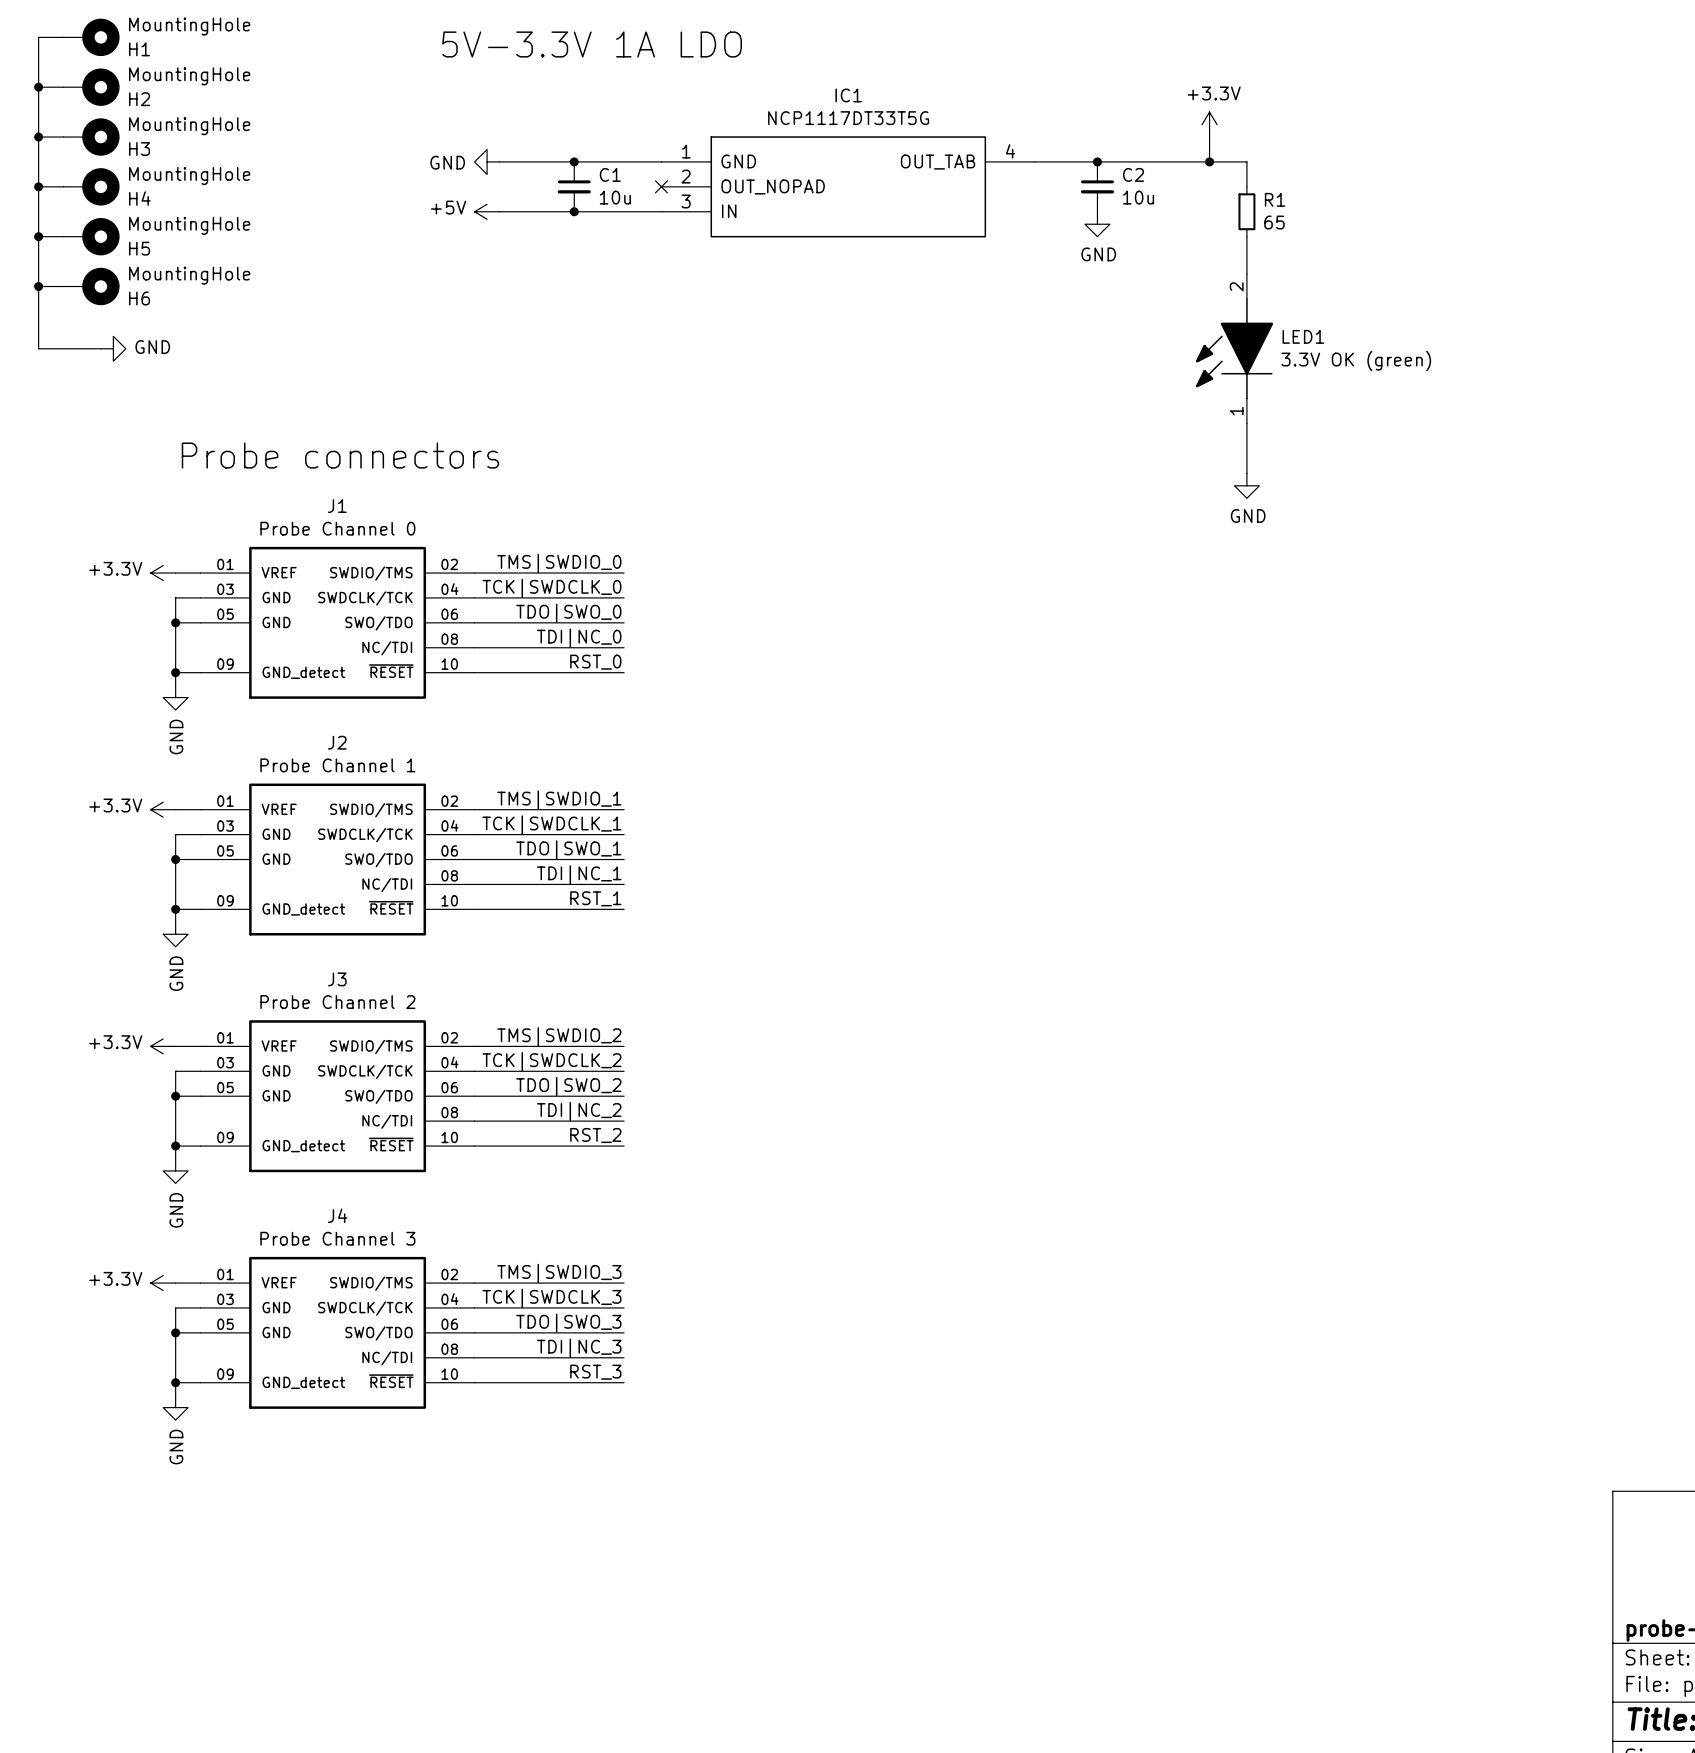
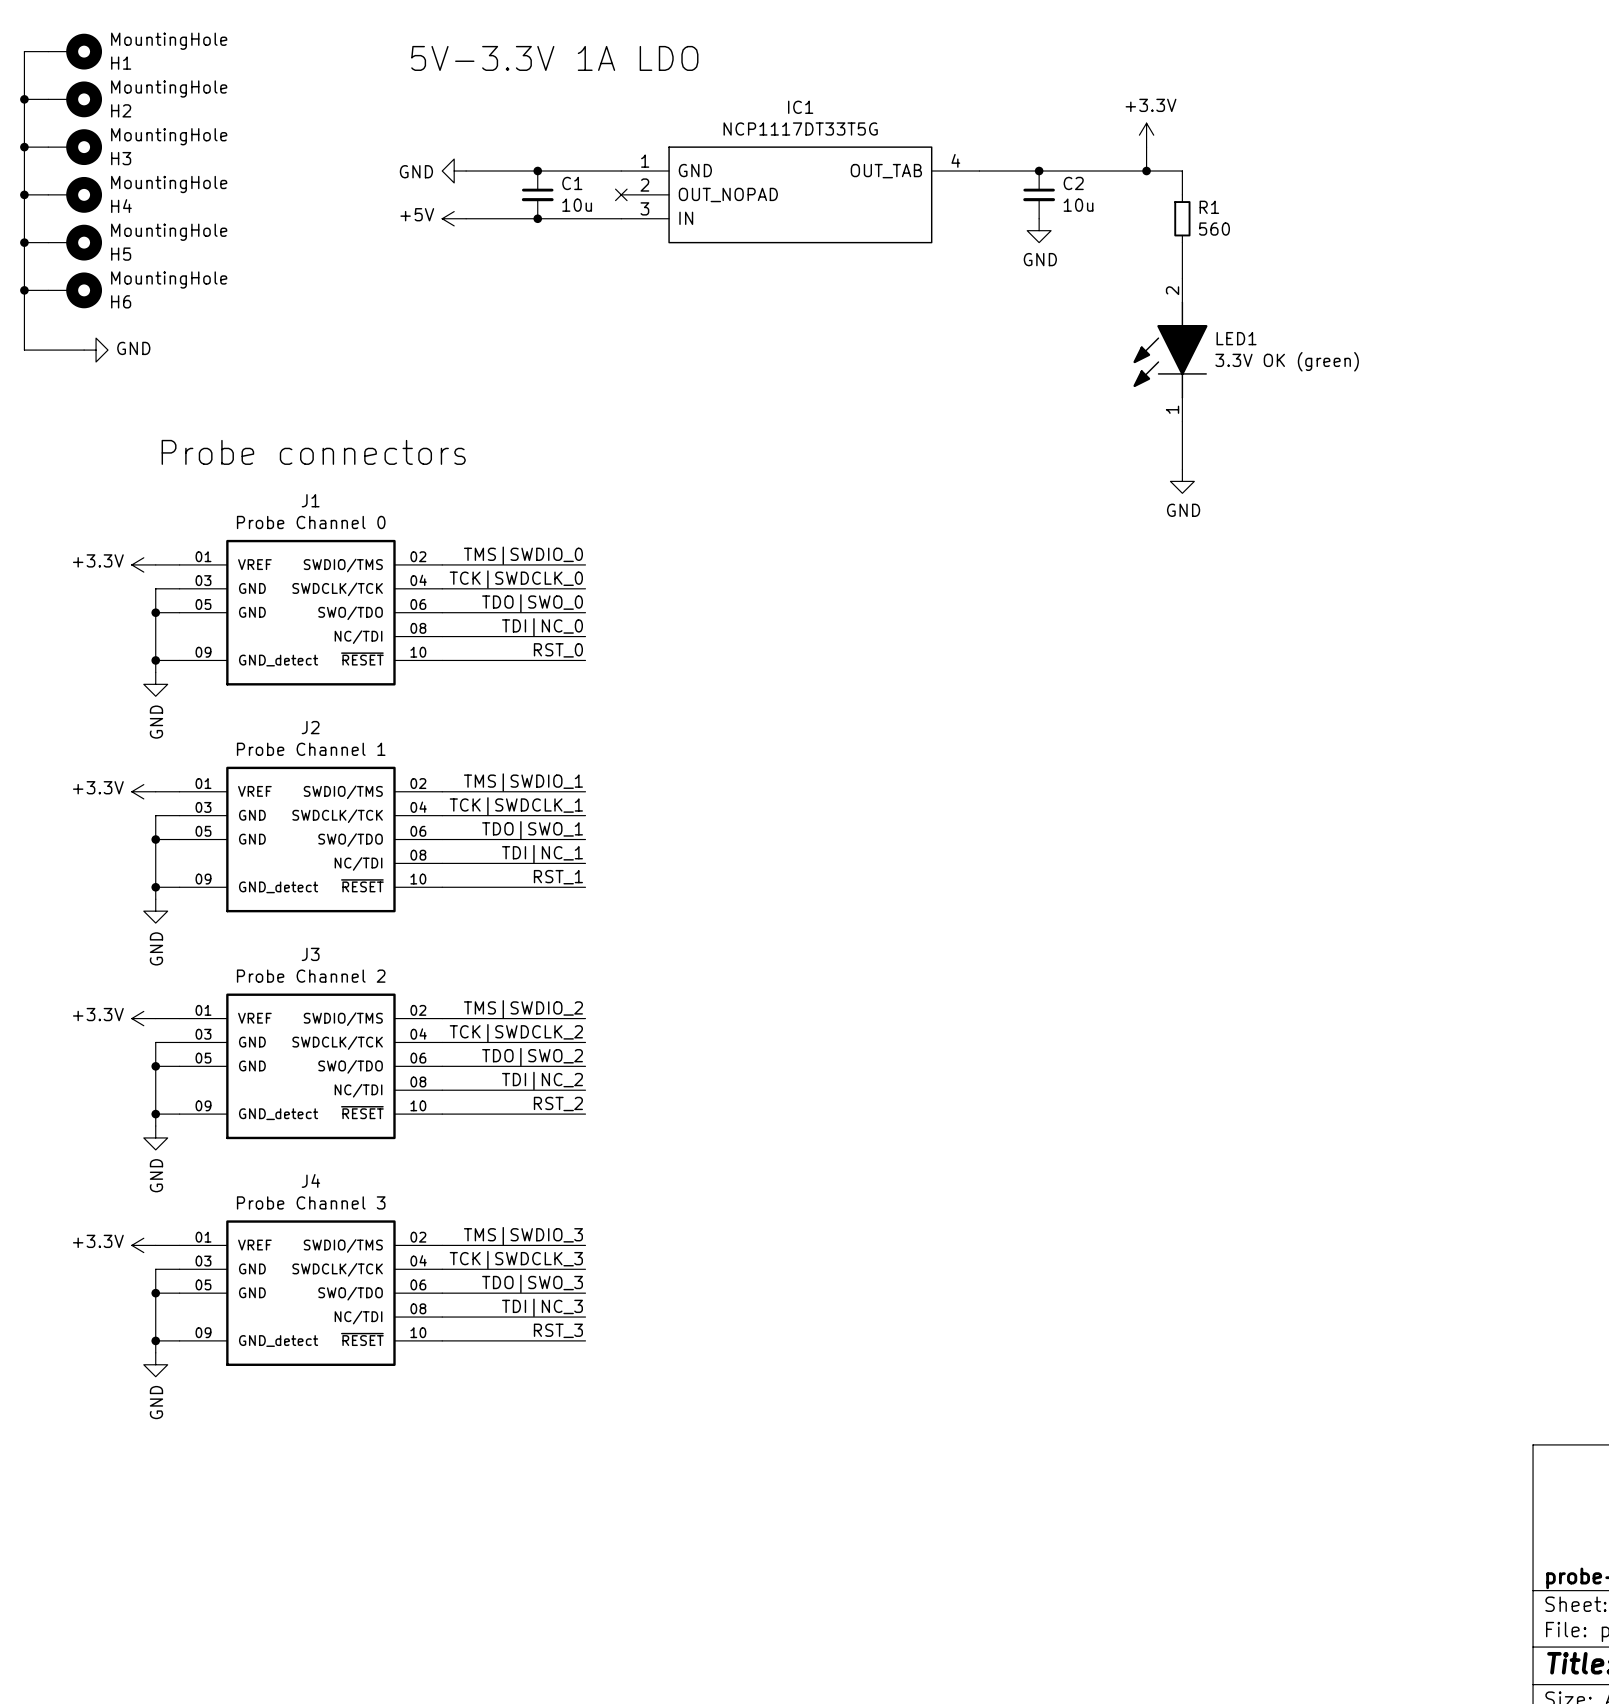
R1 value: 65 (1274, 222) -> 560 (1214, 229)

